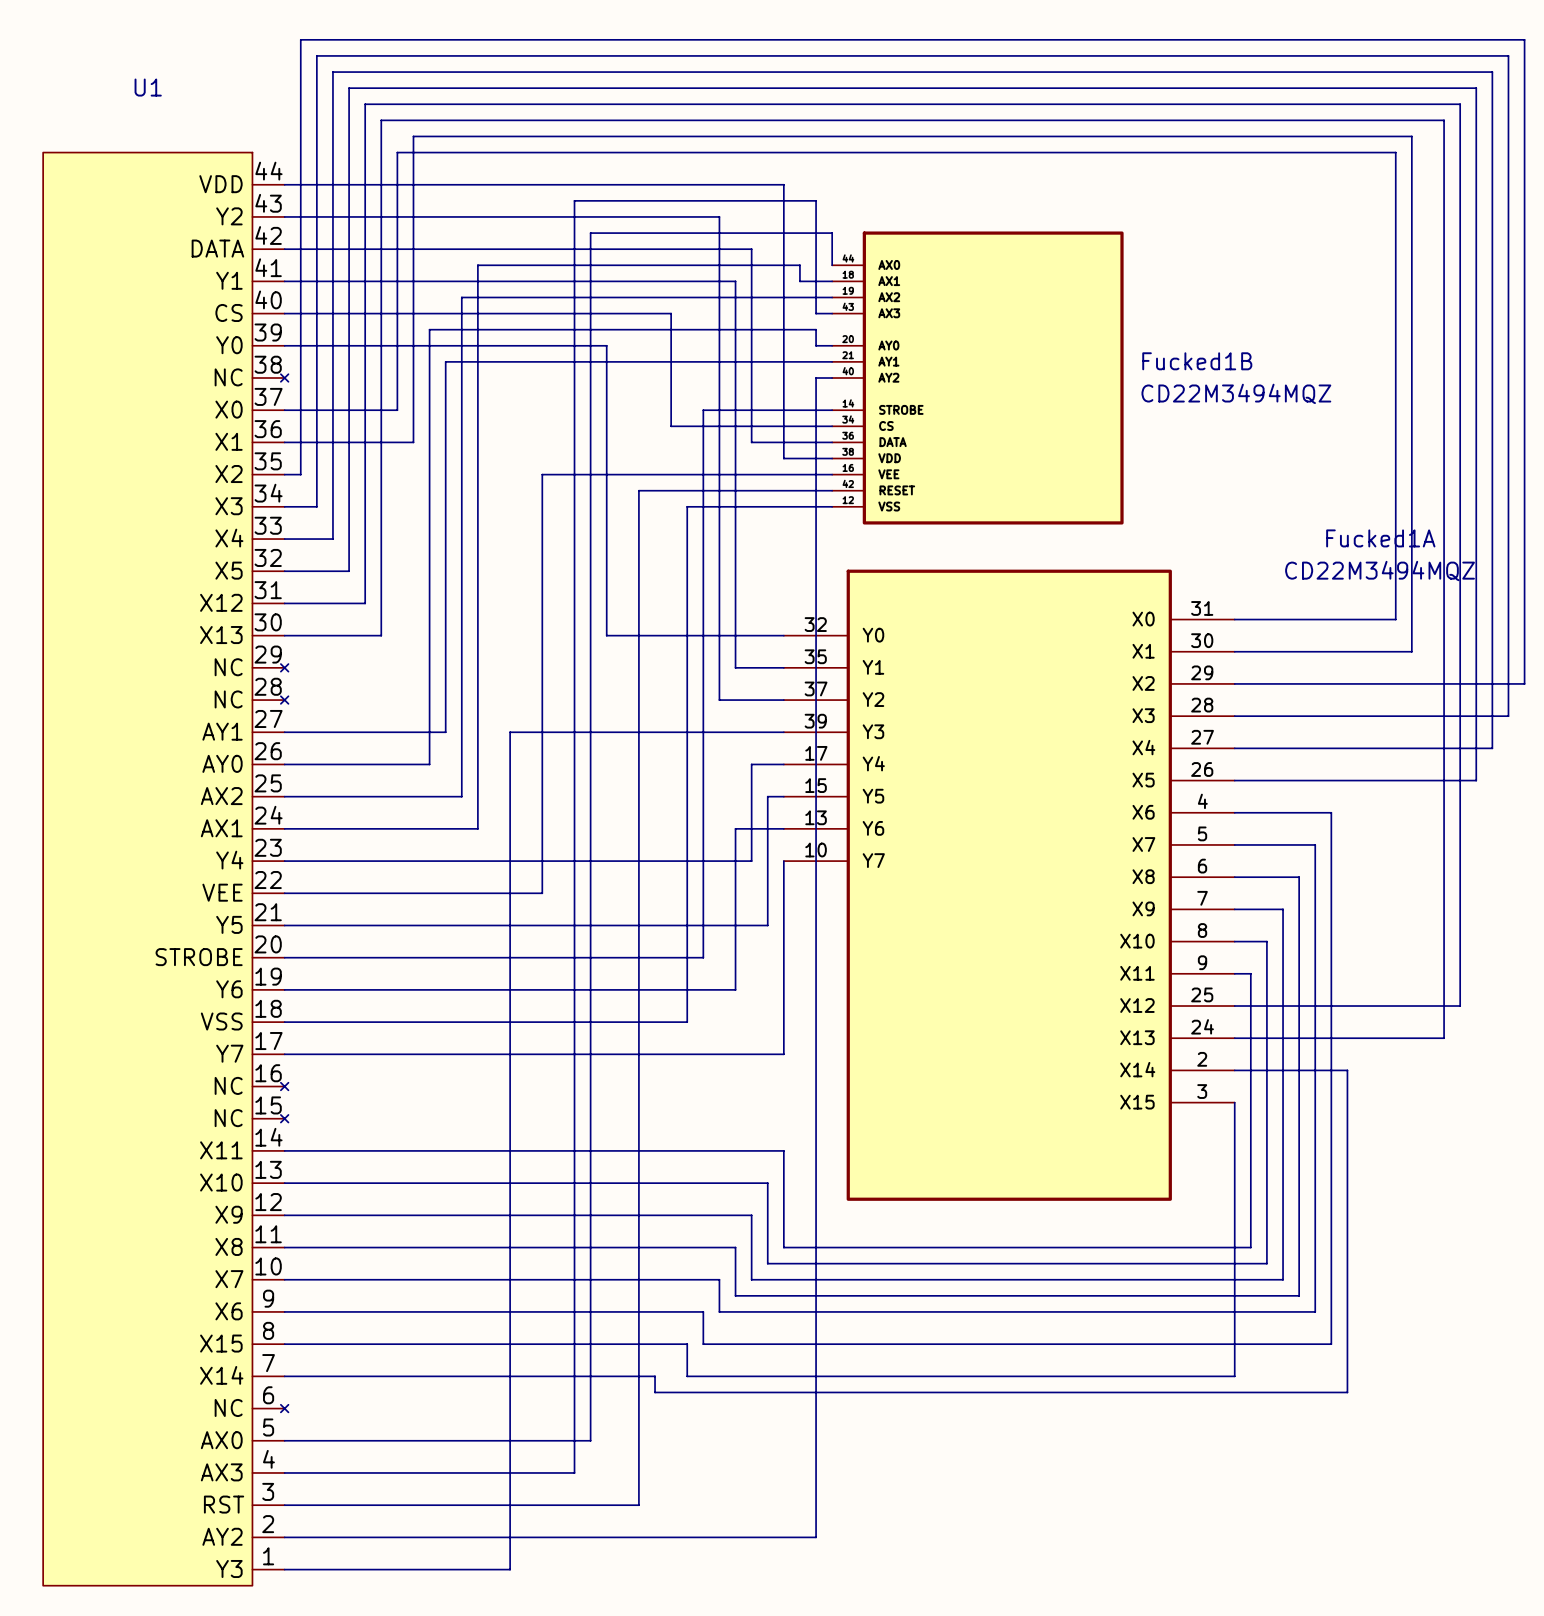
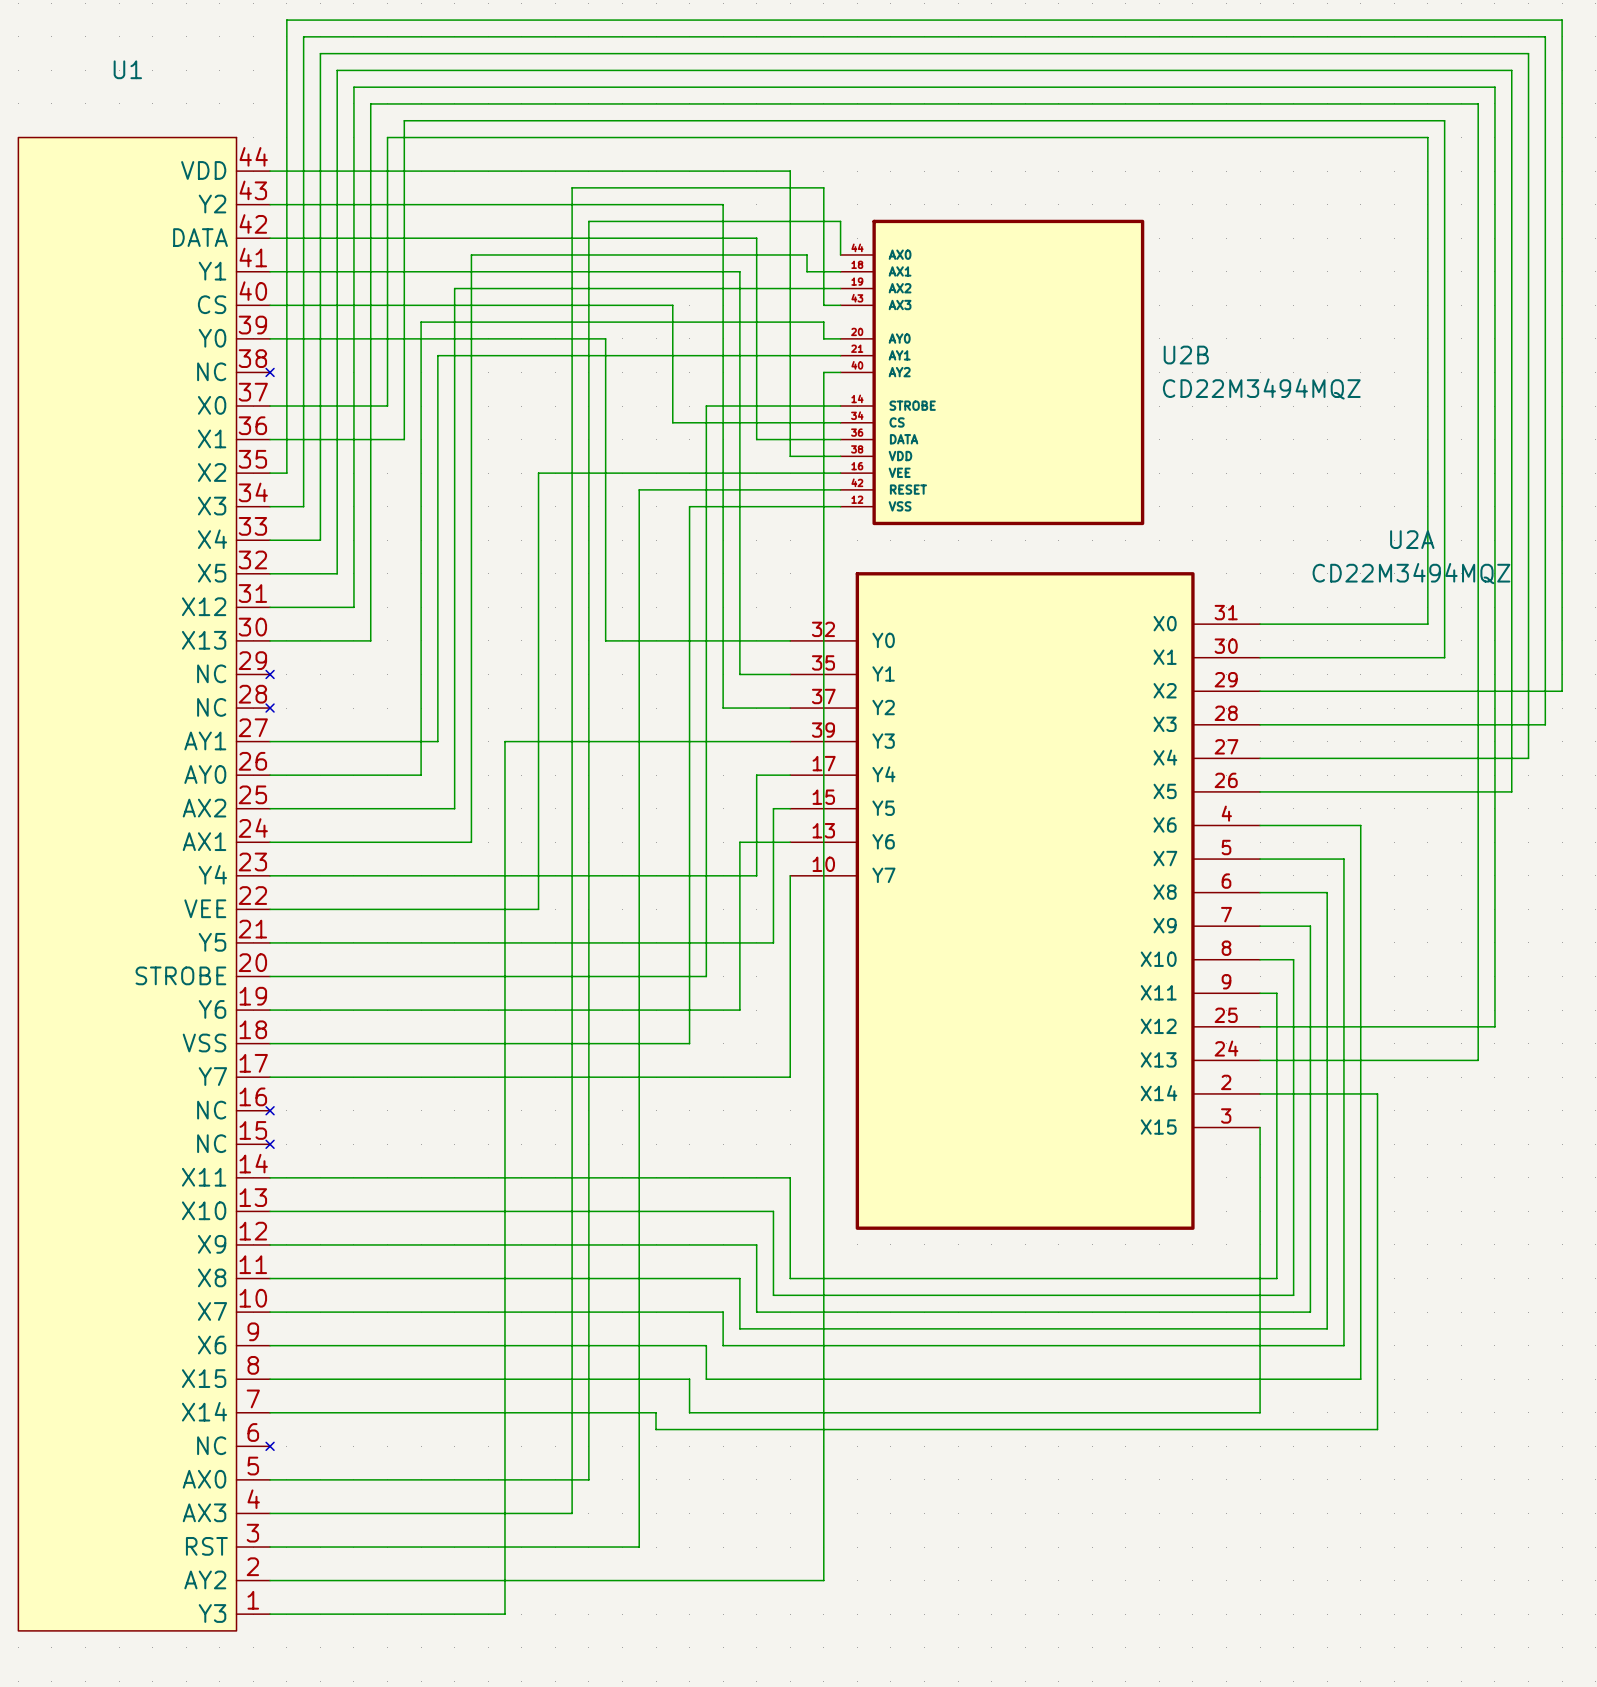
Fucked1B name: Fucked1B (1197, 361) -> U2B (1186, 355)
Fucked1A name: Fucked1A (1380, 538) -> U2A (1412, 539)

